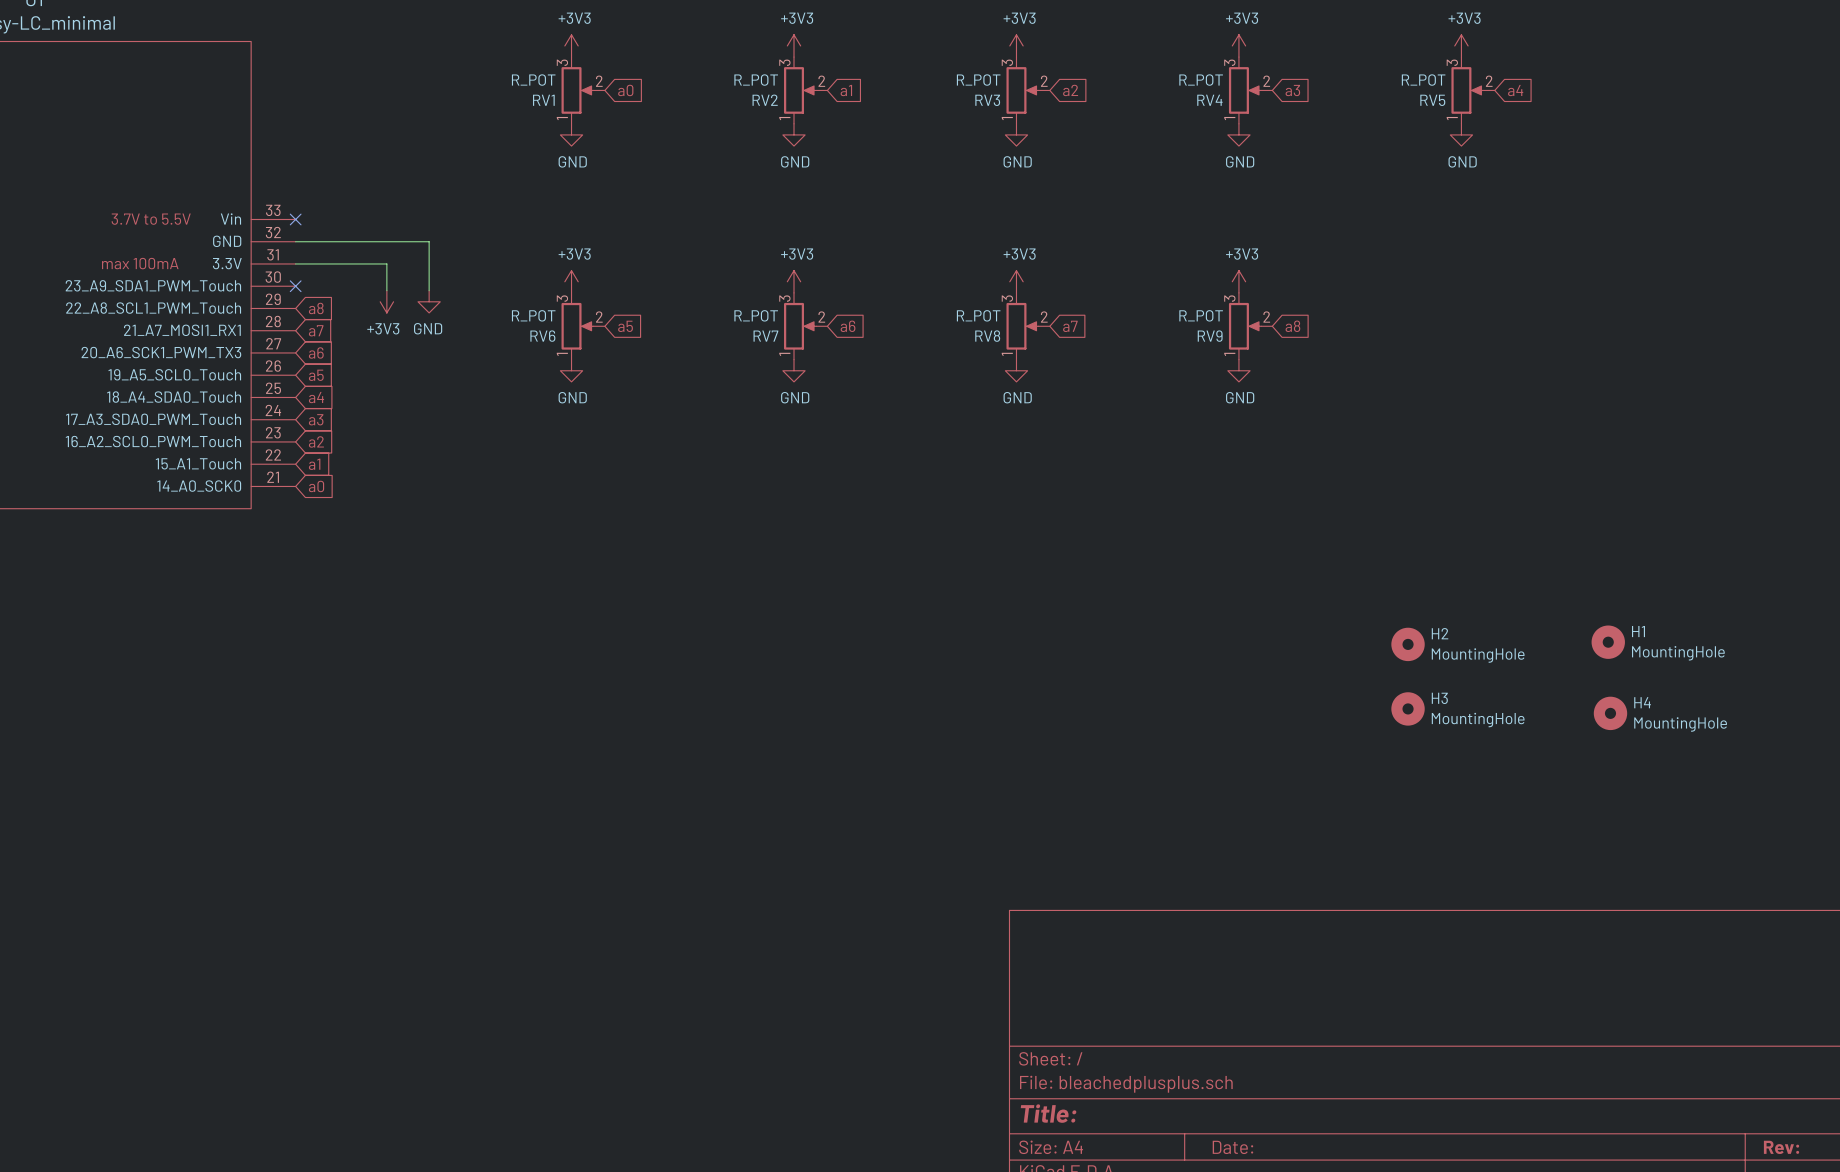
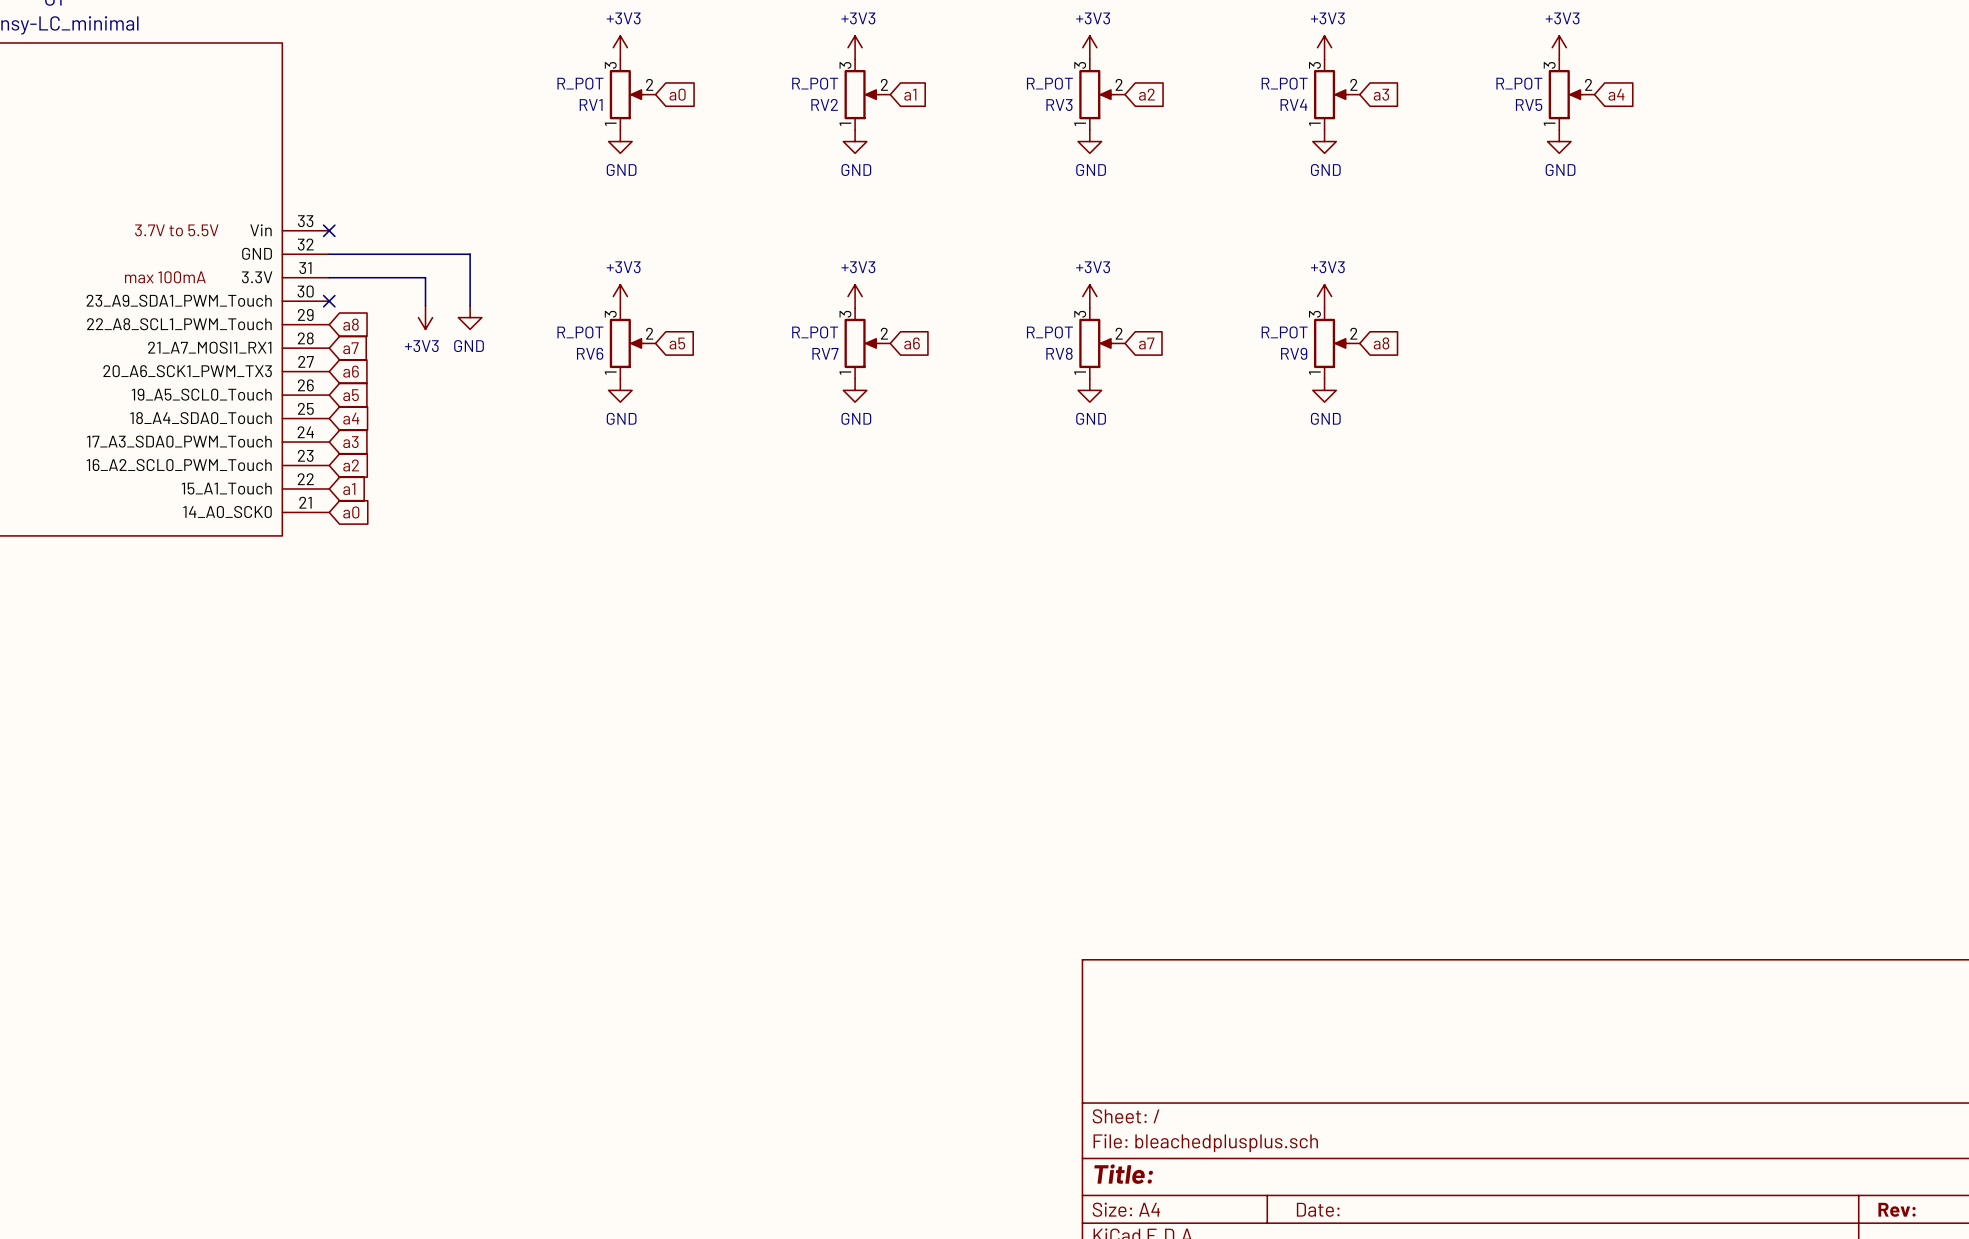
H1: MountingHole (1608, 642) -> none
H2: MountingHole (1408, 644) -> none
H3: MountingHole (1408, 708) -> none
H4: MountingHole (1610, 713) -> none

